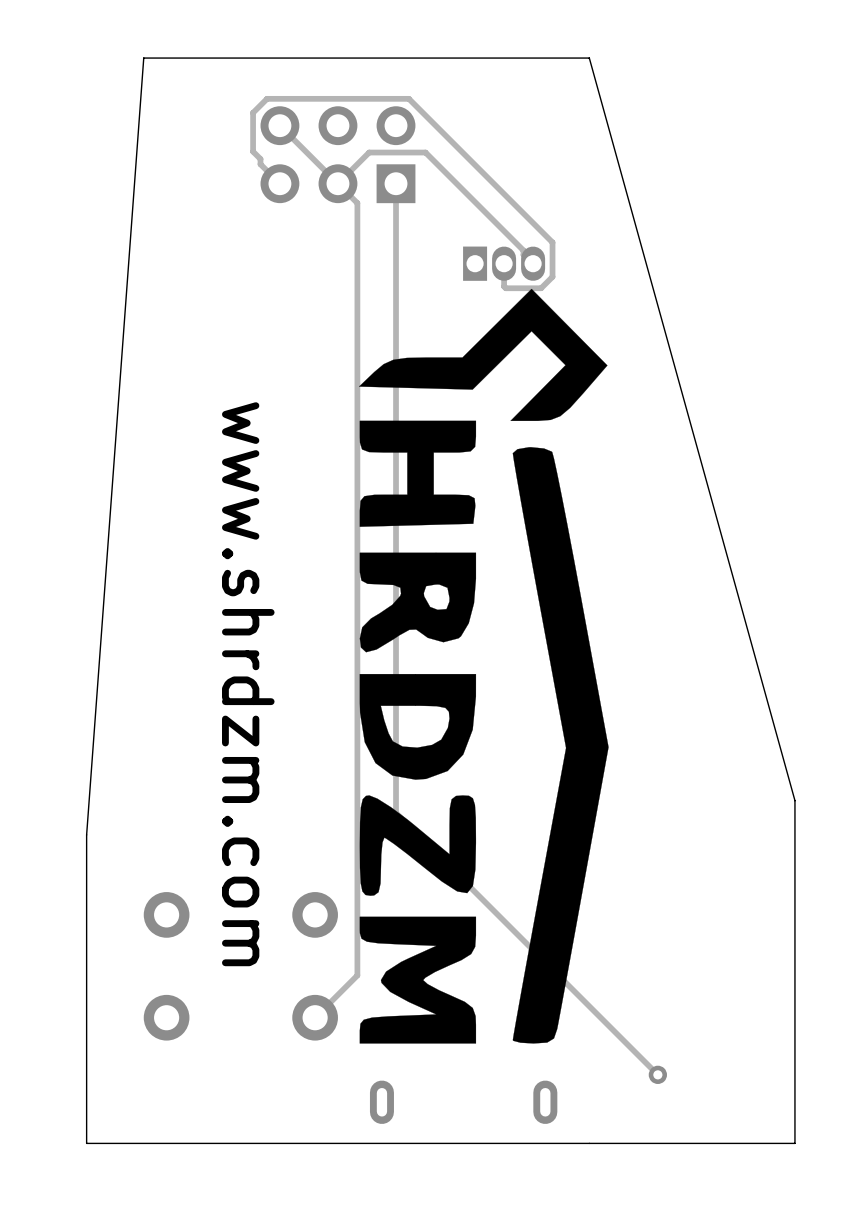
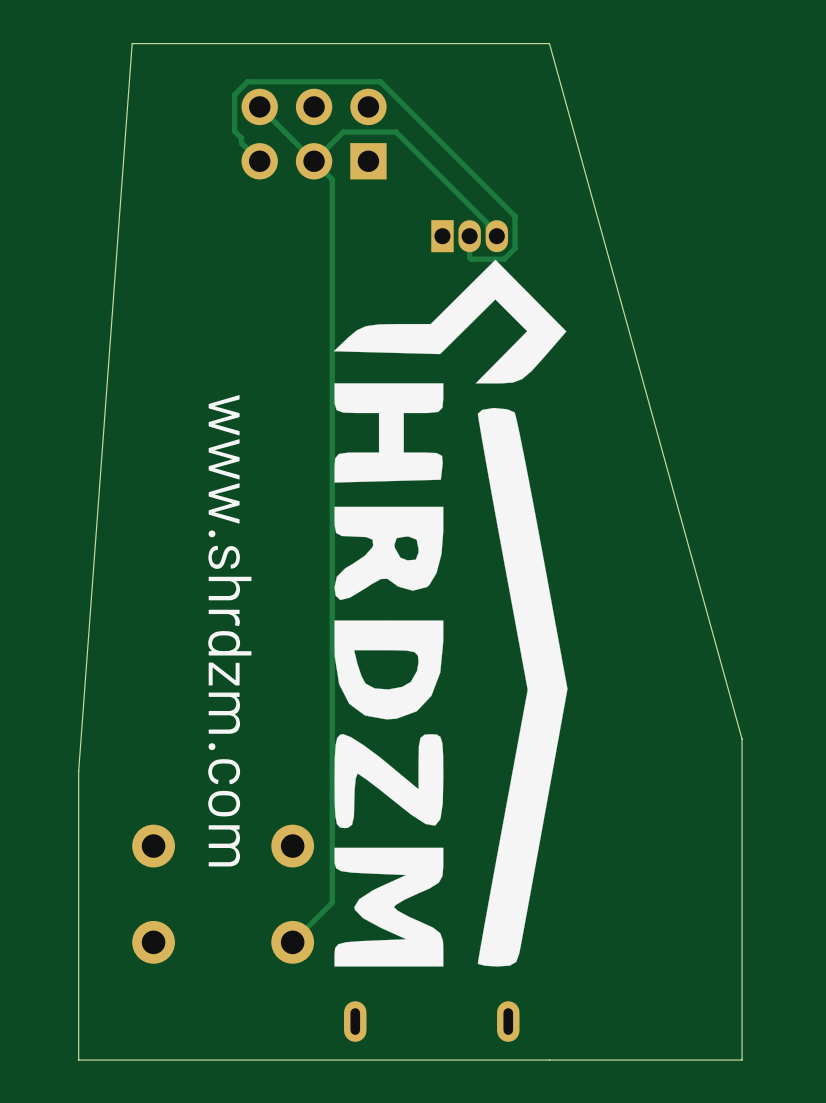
track: (396, 183) (396, 812) (657, 1074) -> none
via: (657, 1074) -> none

